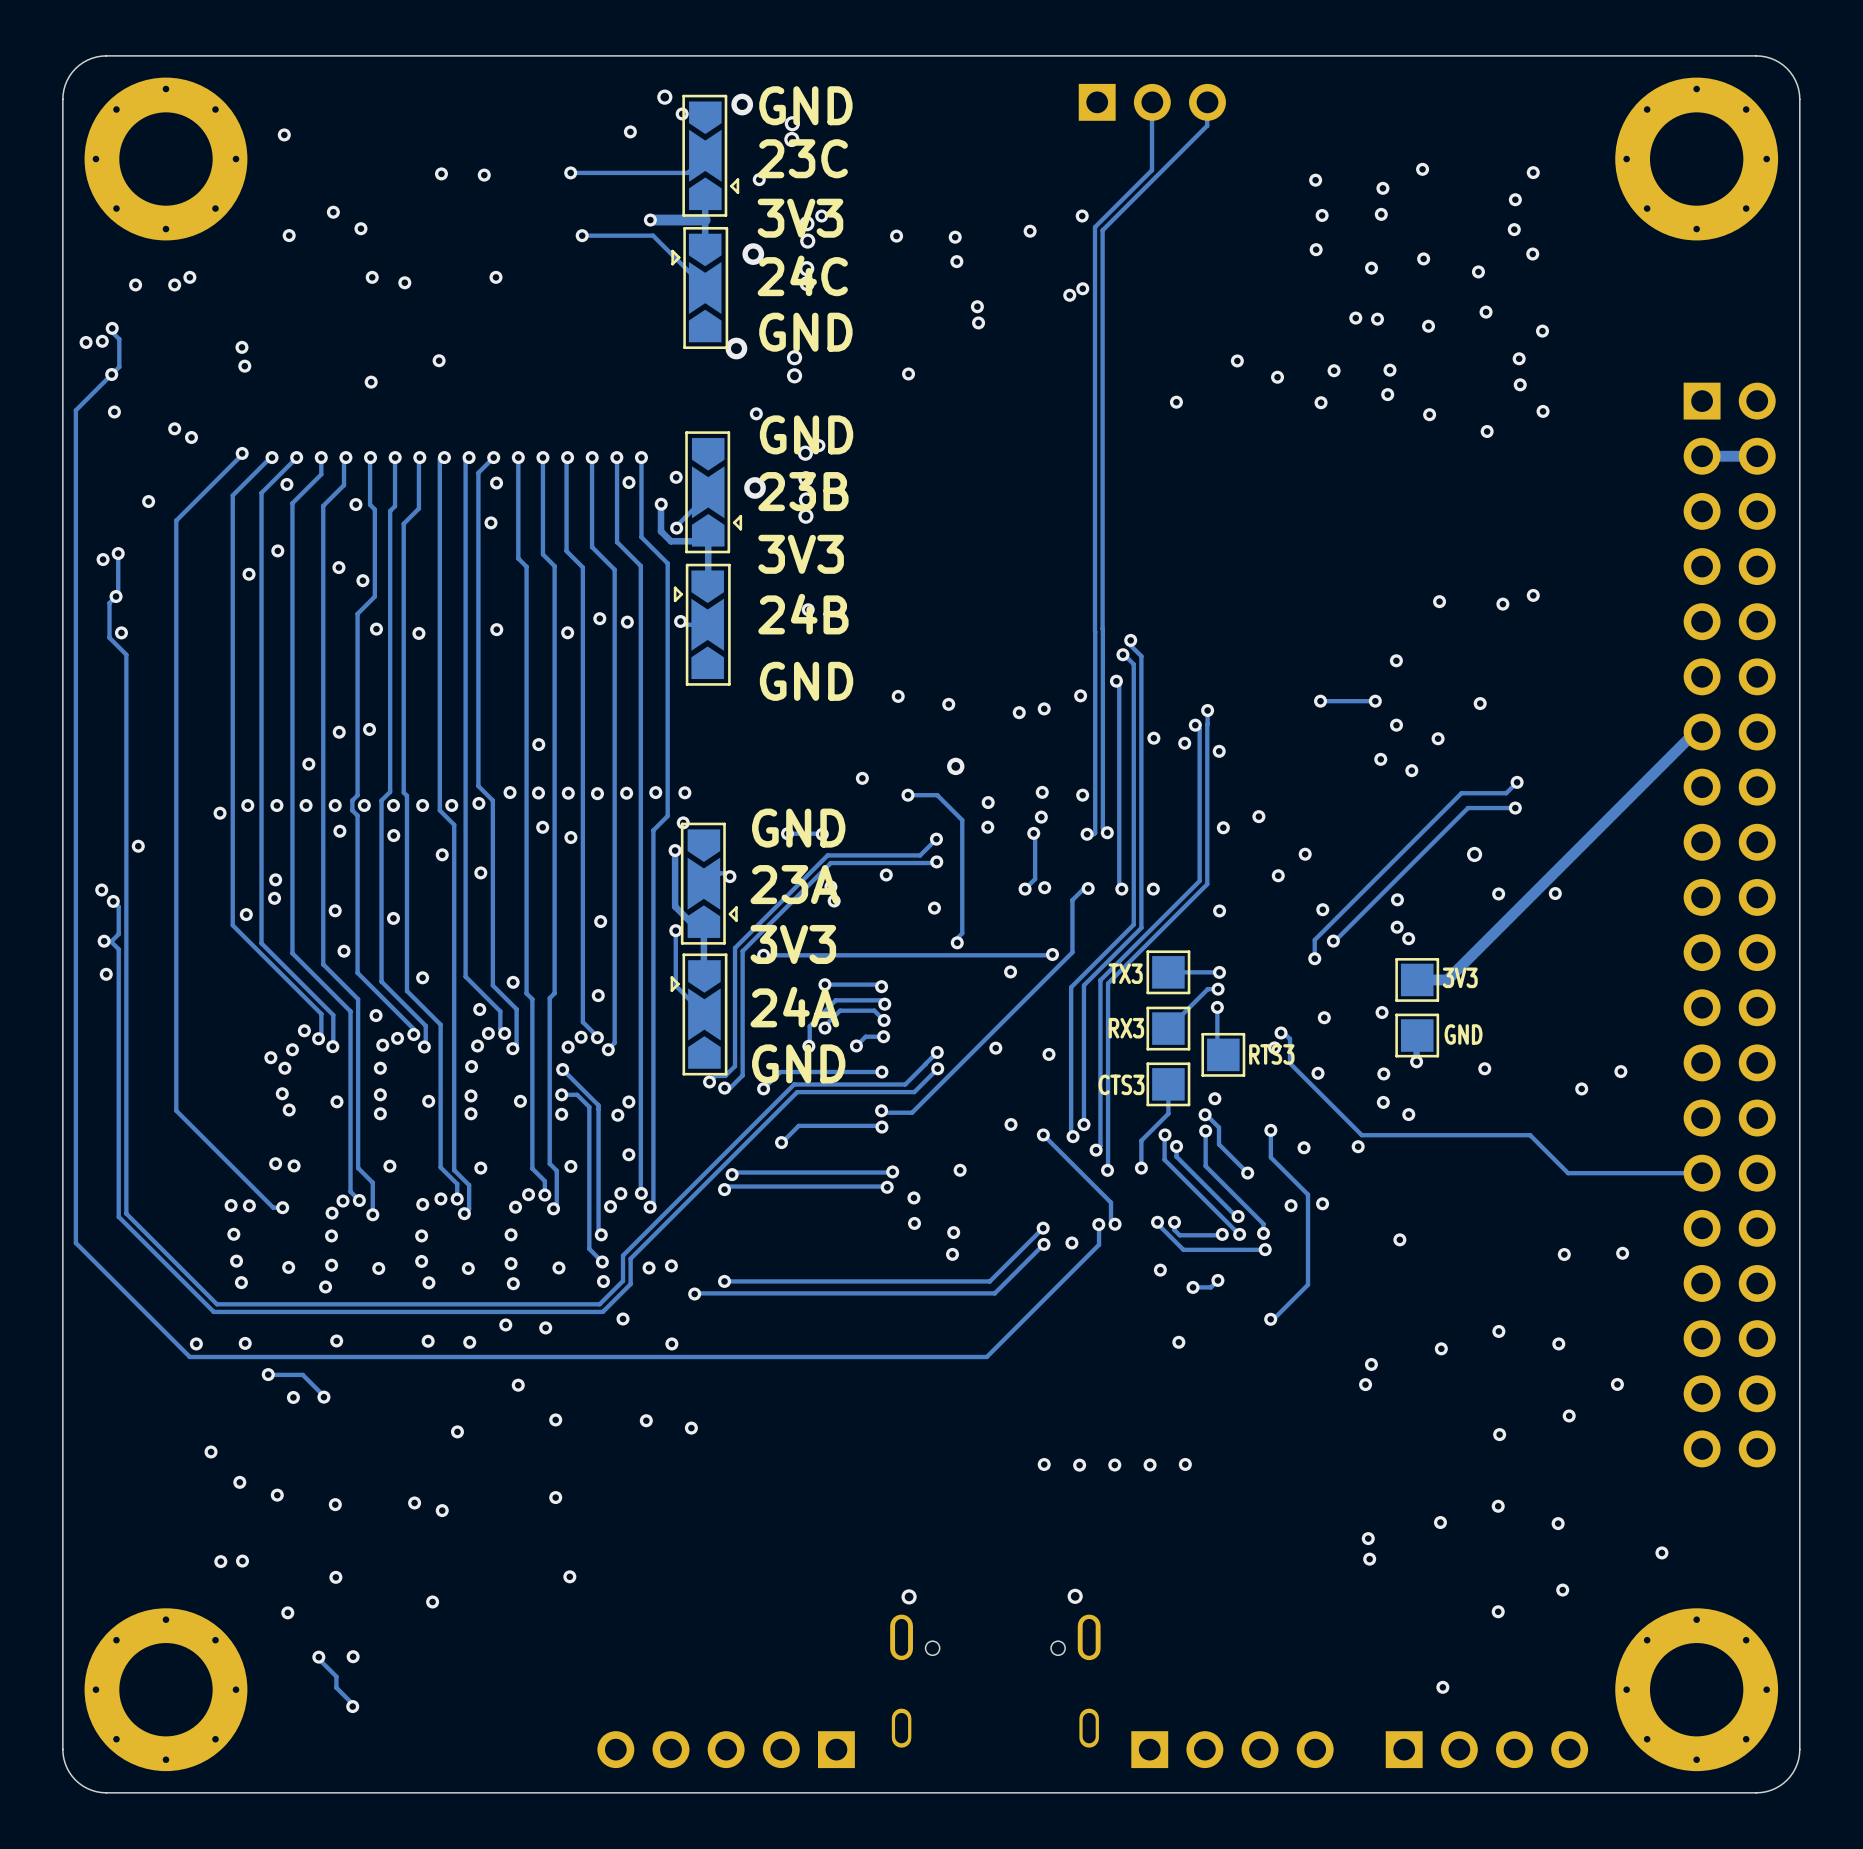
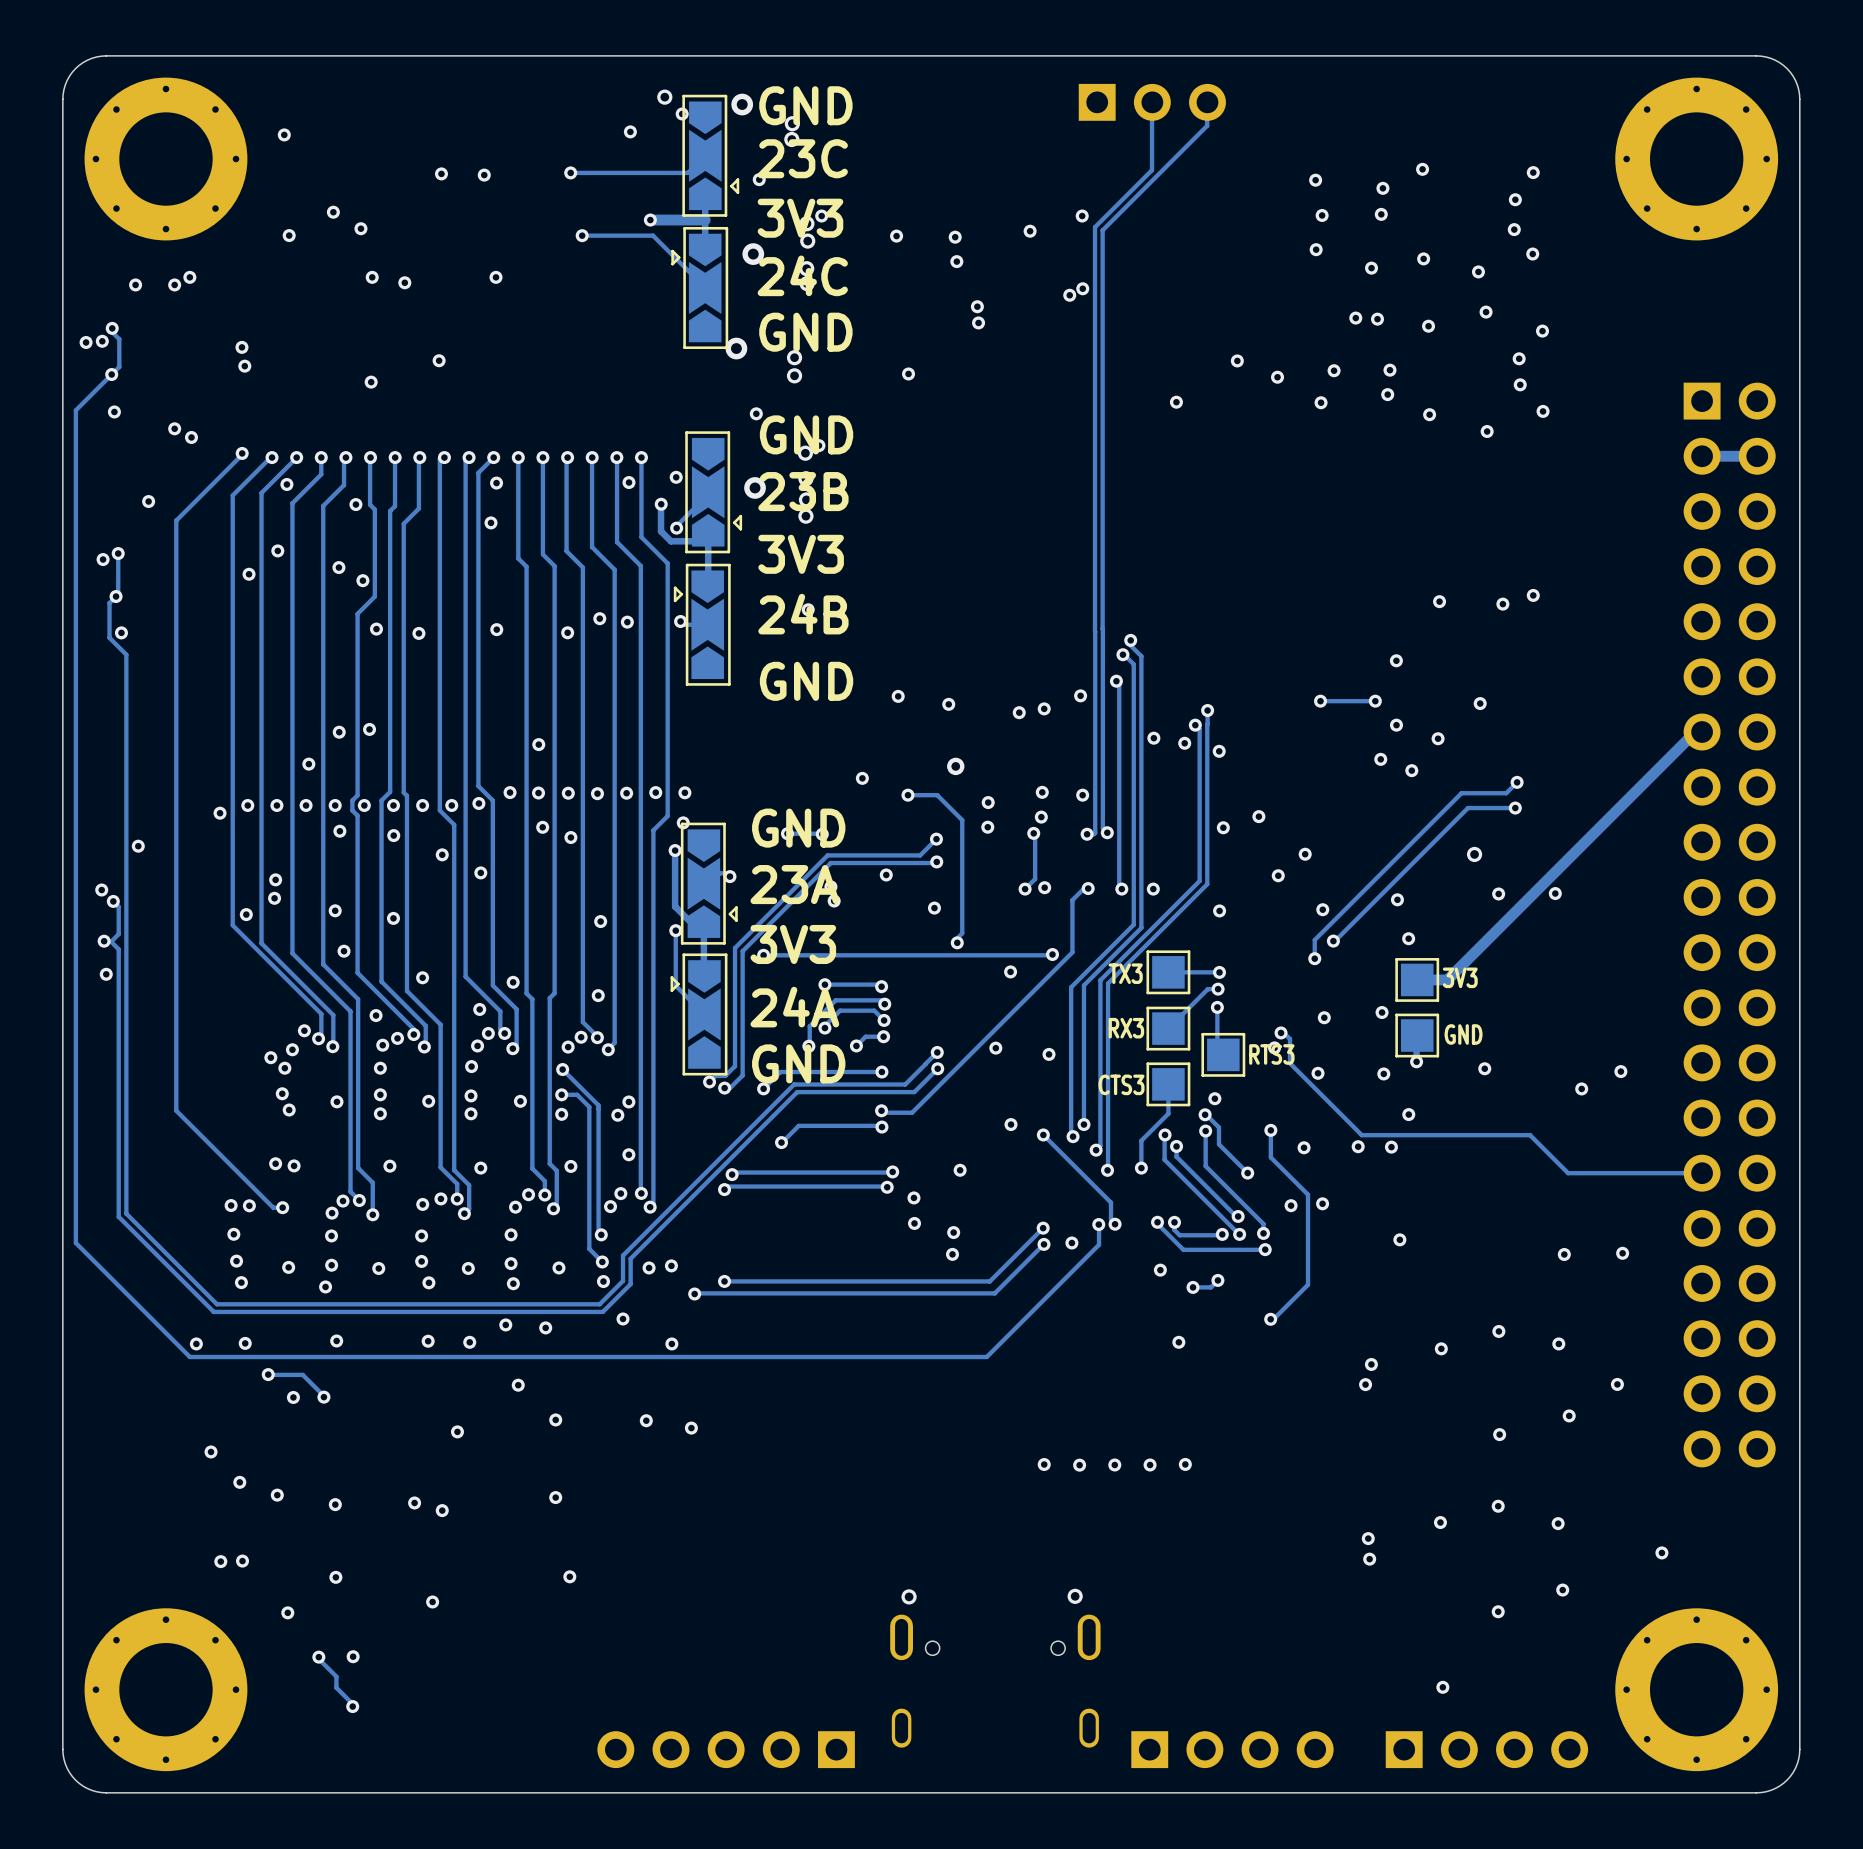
via: (1397, 927) -> none
via position: (1383, 1102) -> (1391, 1147)

